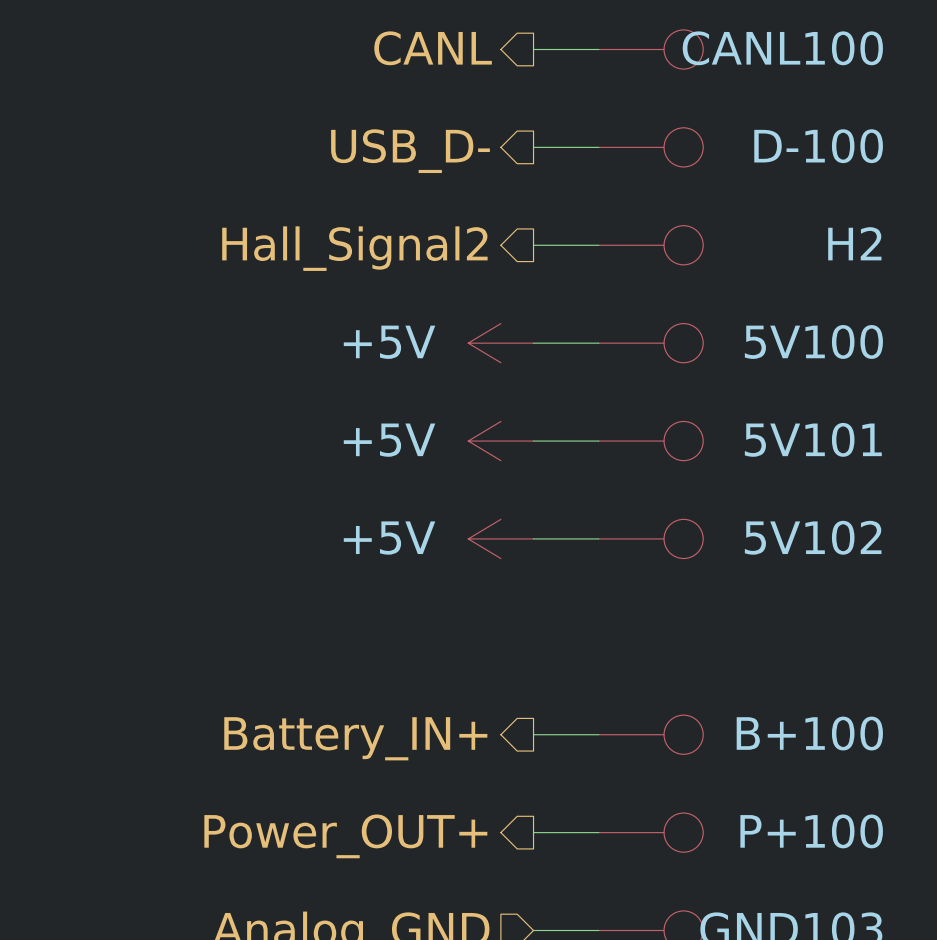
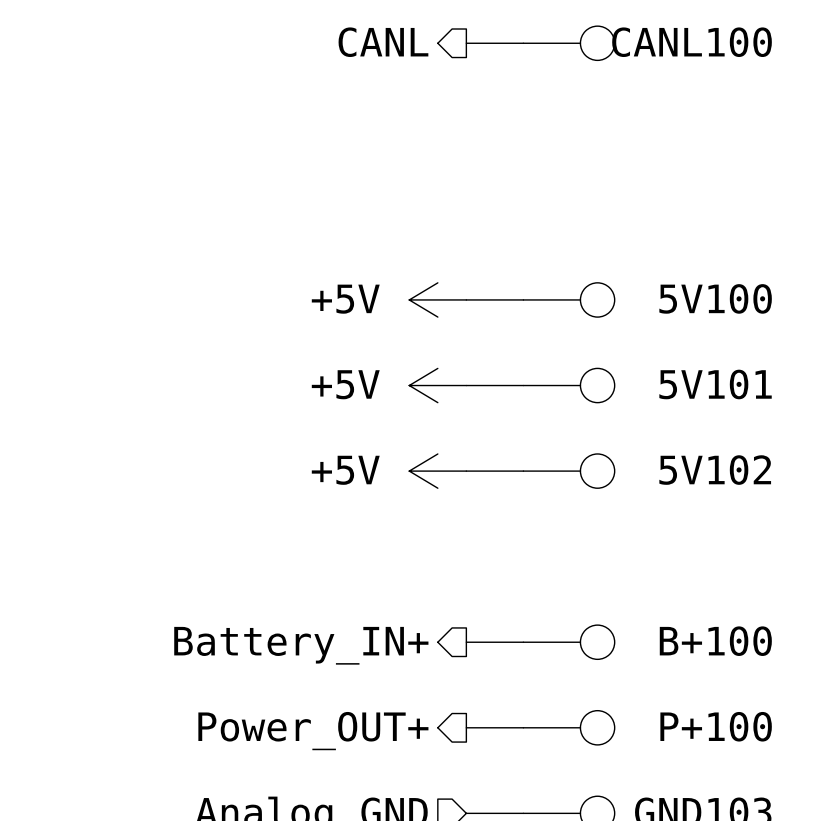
wire: (533, 147) (598, 147) -> none
D-100: (650, 147) -> none
hierarchical label: USB_D- (410, 151) -> none
wire: (533, 245) (598, 245) -> none
H2: (650, 245) -> none
hierarchical label: Hall_Signal2 (354, 248) -> none

